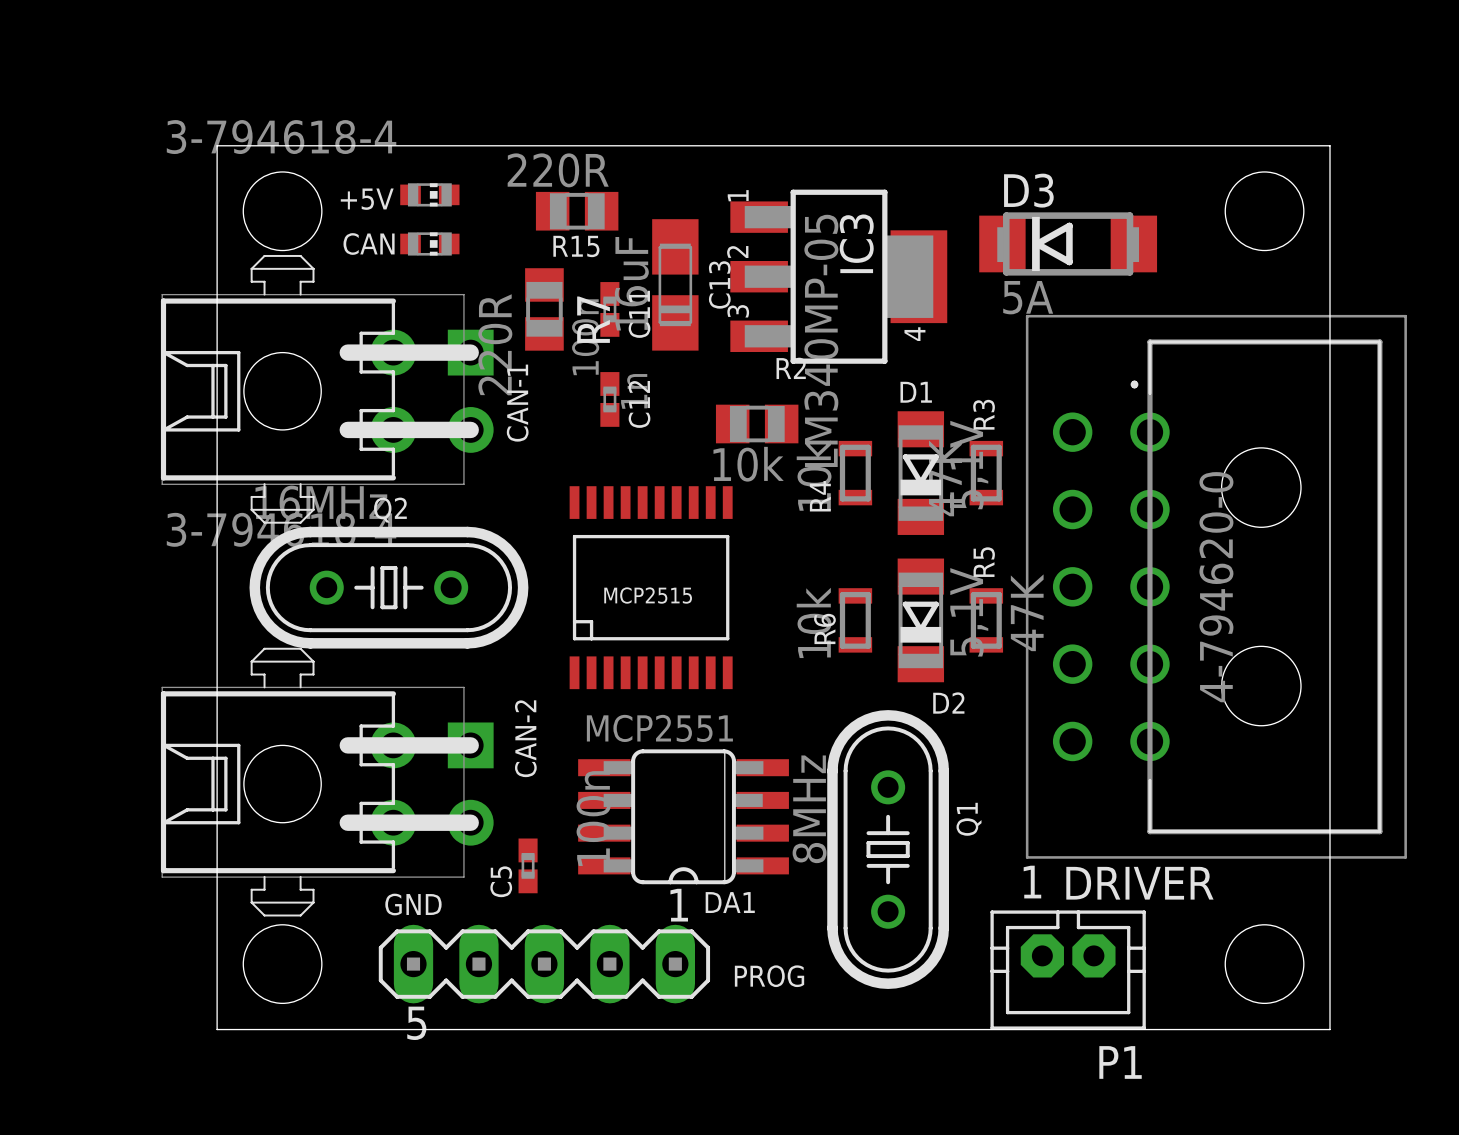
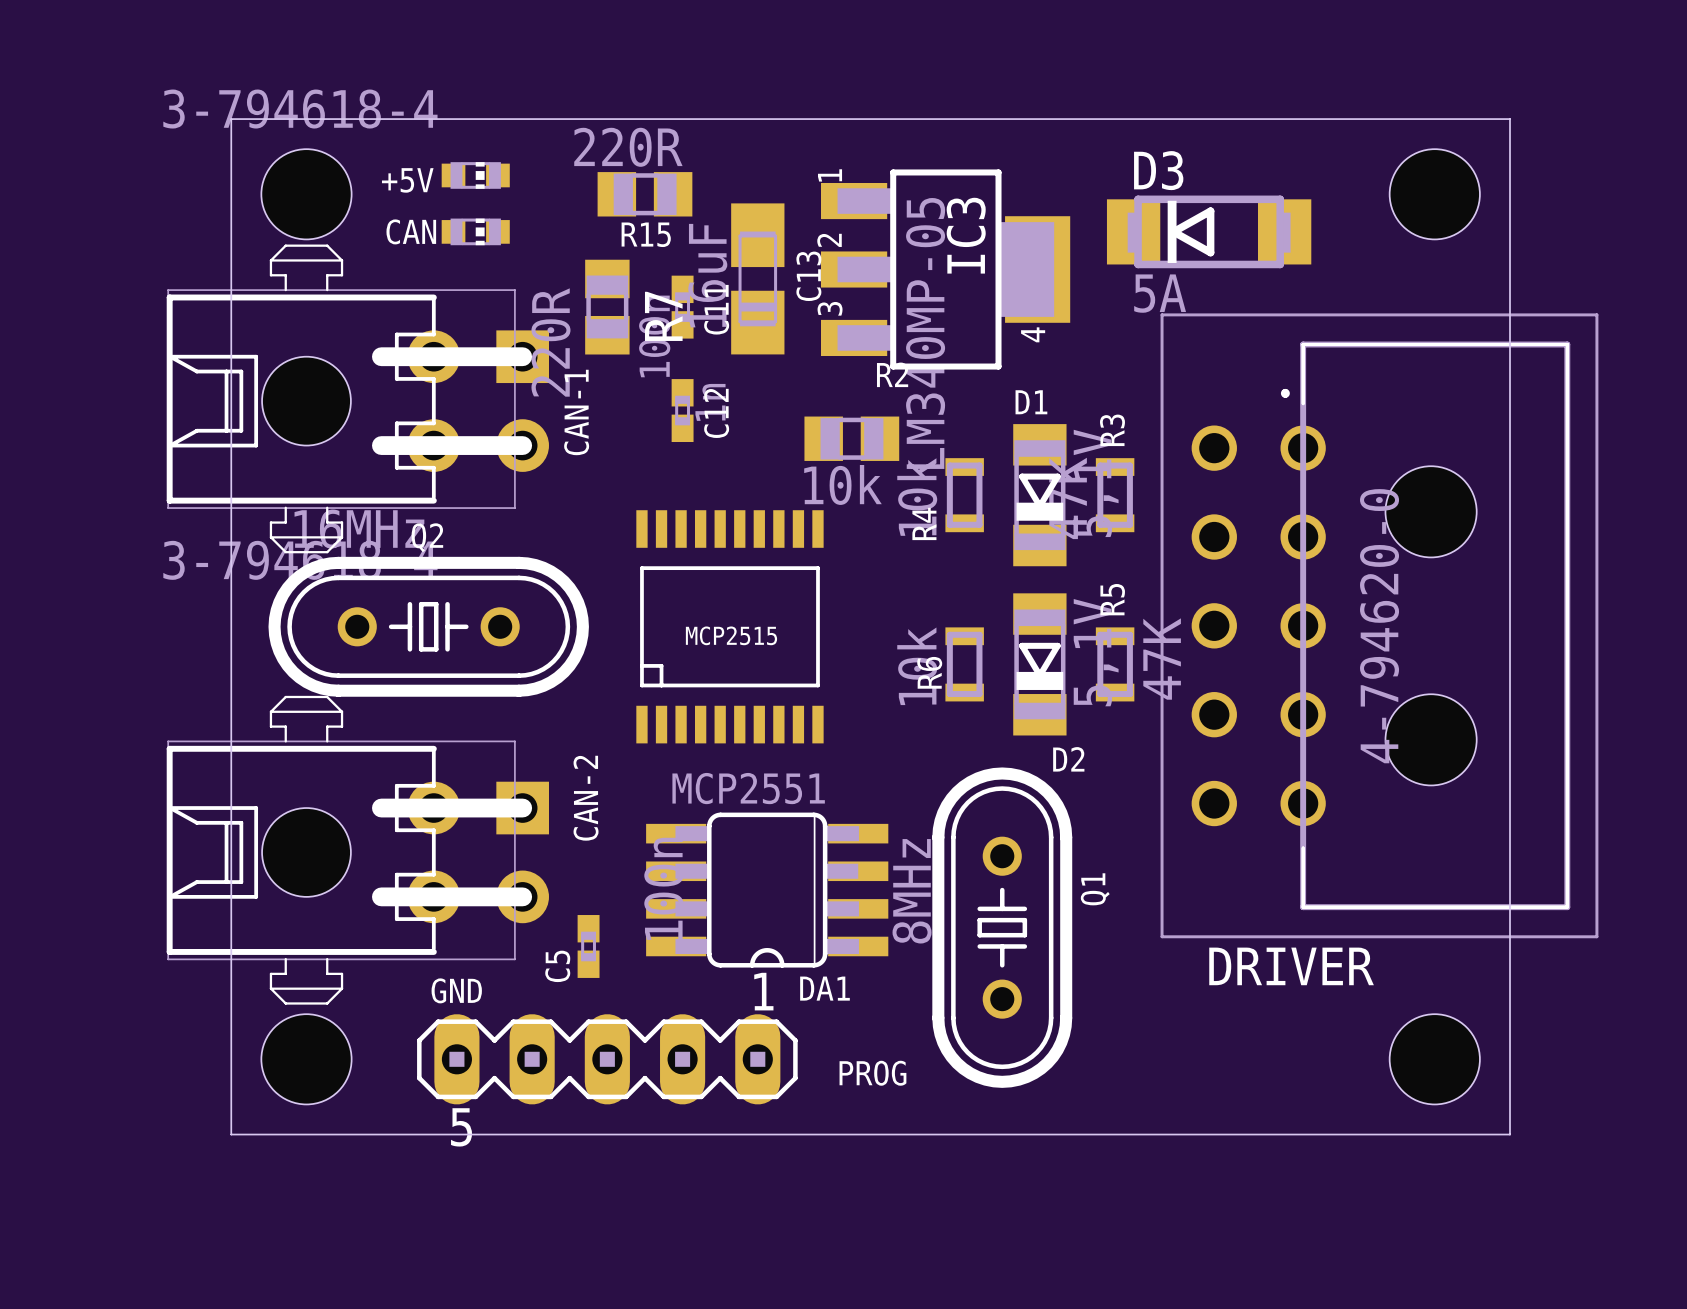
P1: (1068, 970) -> none

